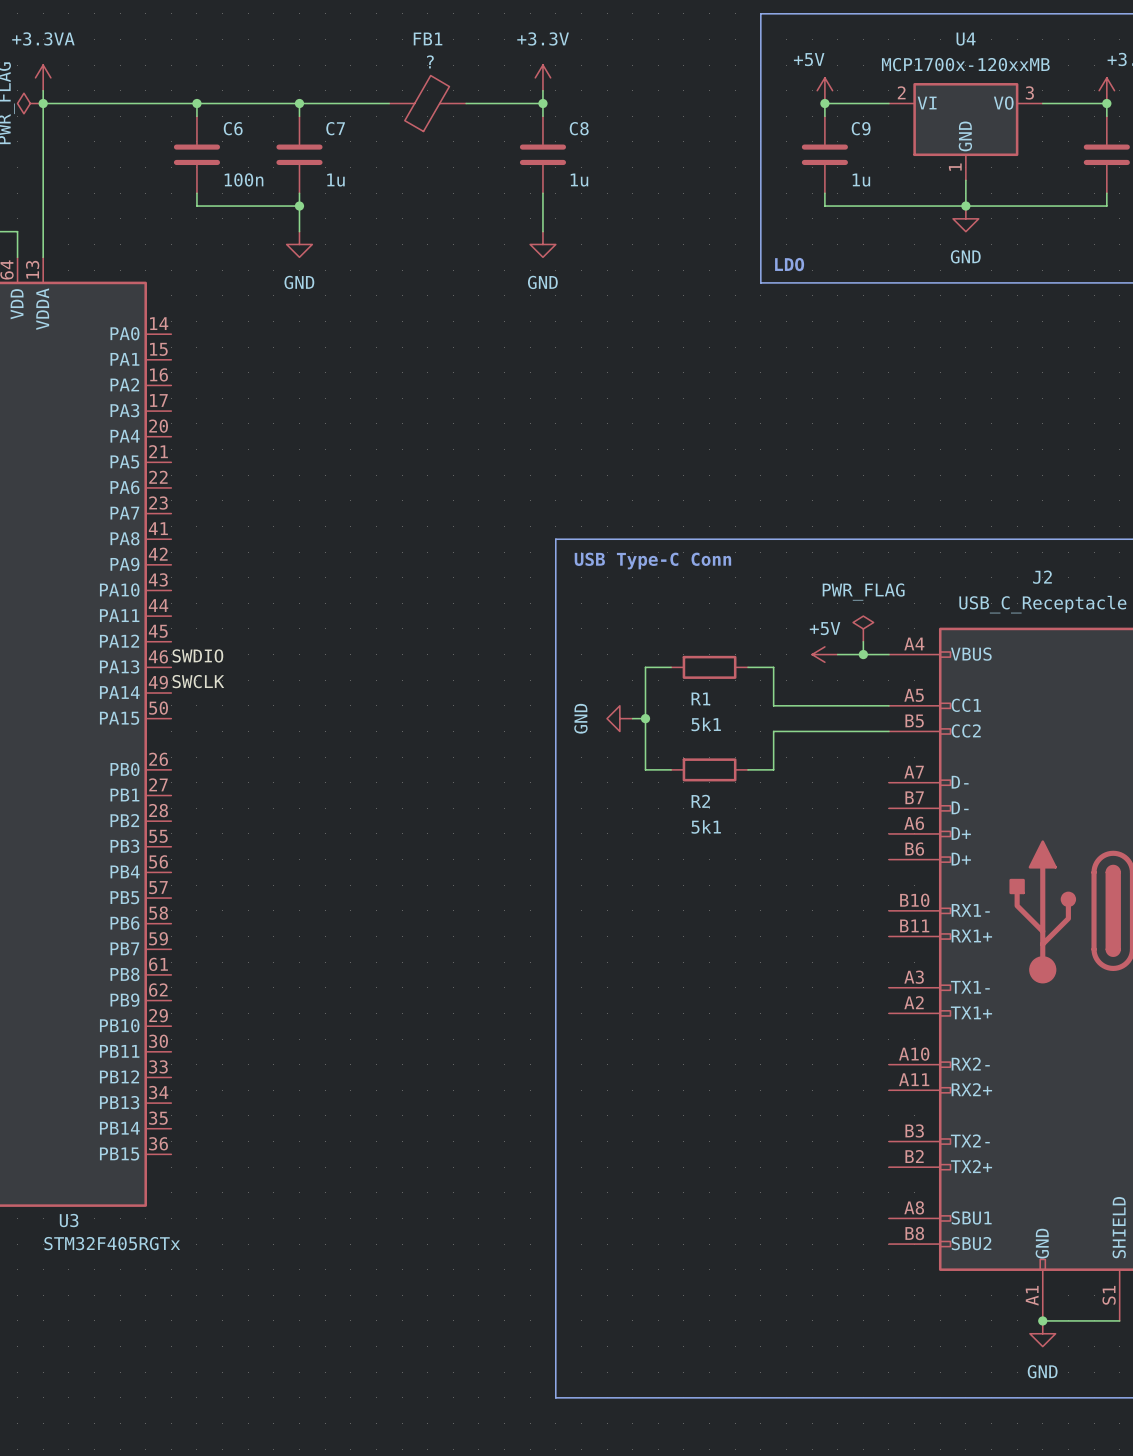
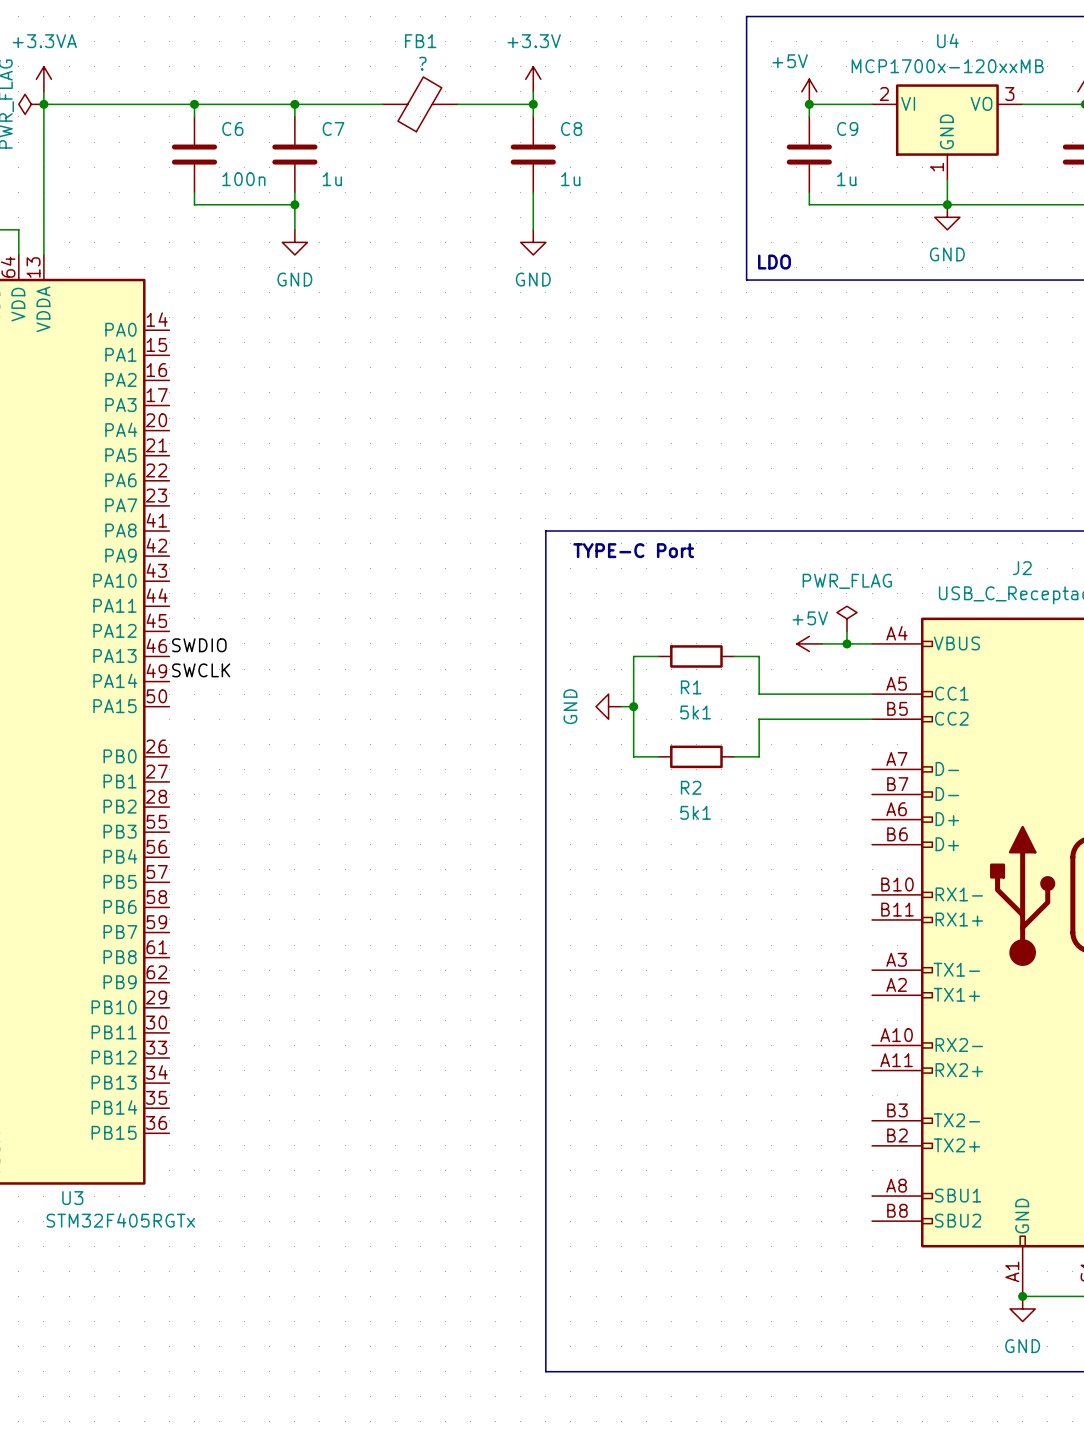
text: USB Type-C Conn (652, 561) -> TYPE-C Port (633, 550)

